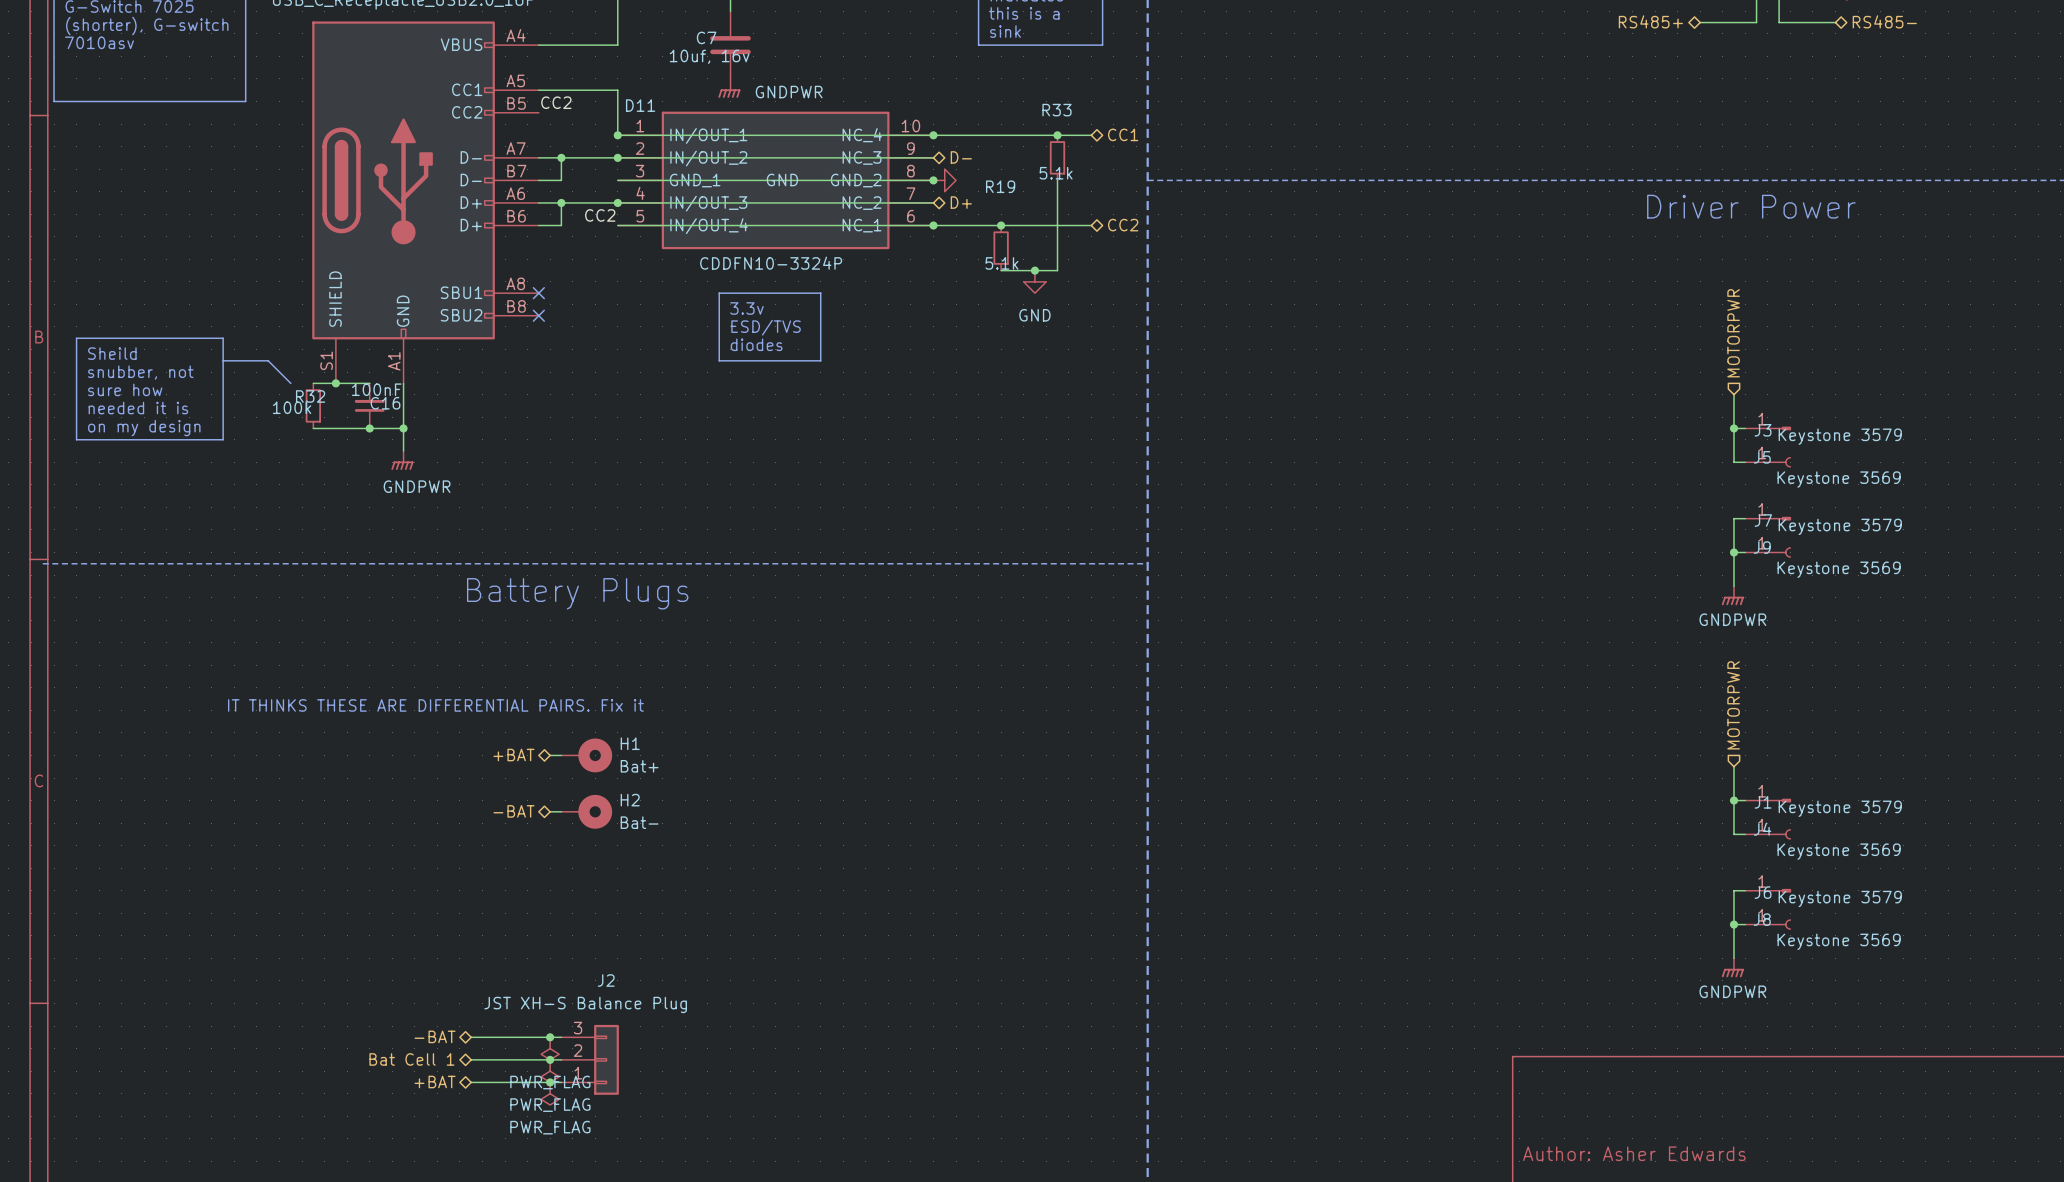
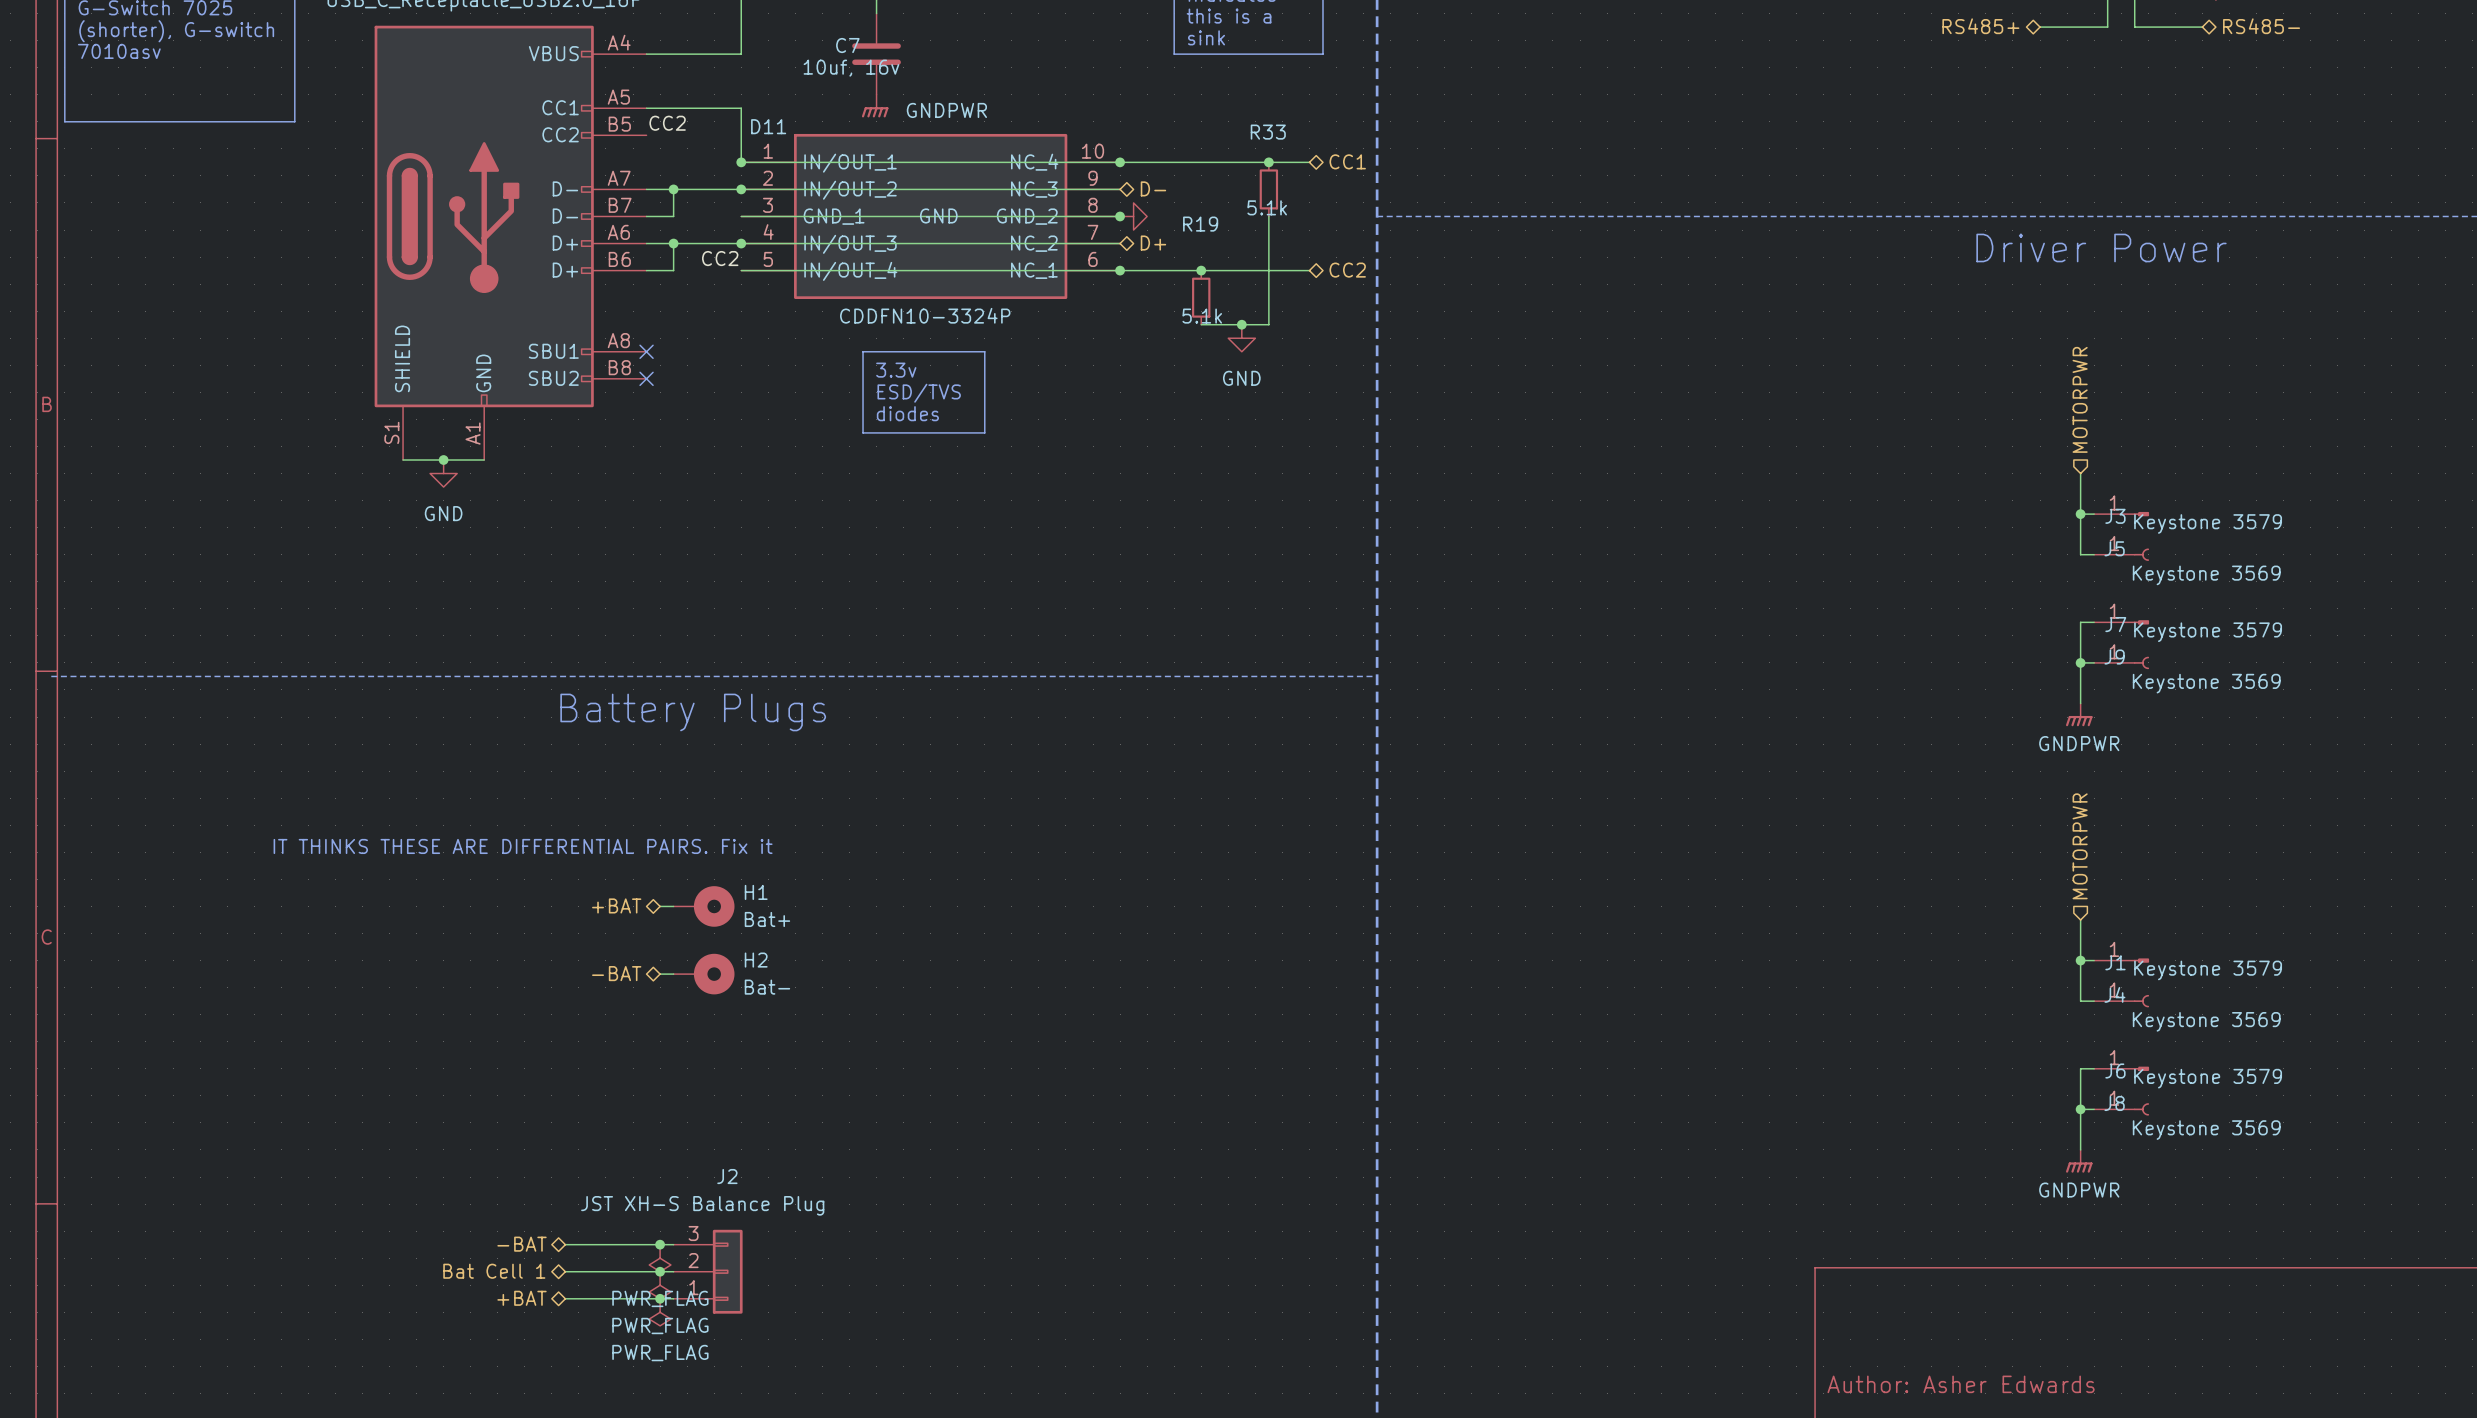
line: (76, 338) (223, 338) (223, 439) (76, 439) (76, 338) -> none
text: Sheild (112, 353) -> none
line: (223, 360) (268, 360) (290, 383) -> none
text: snubber, not (140, 372) -> none
wire: (313, 383) (335, 383) -> none
junction: (335, 383) -> none
junction: none -> (443, 460)
wire: (403, 383) (403, 451) -> (484, 460) (443, 460)
text: sure how (125, 389) -> none
power symbol: none -> GND (443, 473)
R32: 100k (313, 405) -> none
C16: 100nF (369, 405) -> none
text: needed it is (138, 408) -> none
text: on my design (144, 428) -> none
wire: (313, 428) (403, 428) -> none
junction: (369, 428) -> none
junction: (403, 428) -> none
power symbol: GNDPWR (402, 460) -> none

